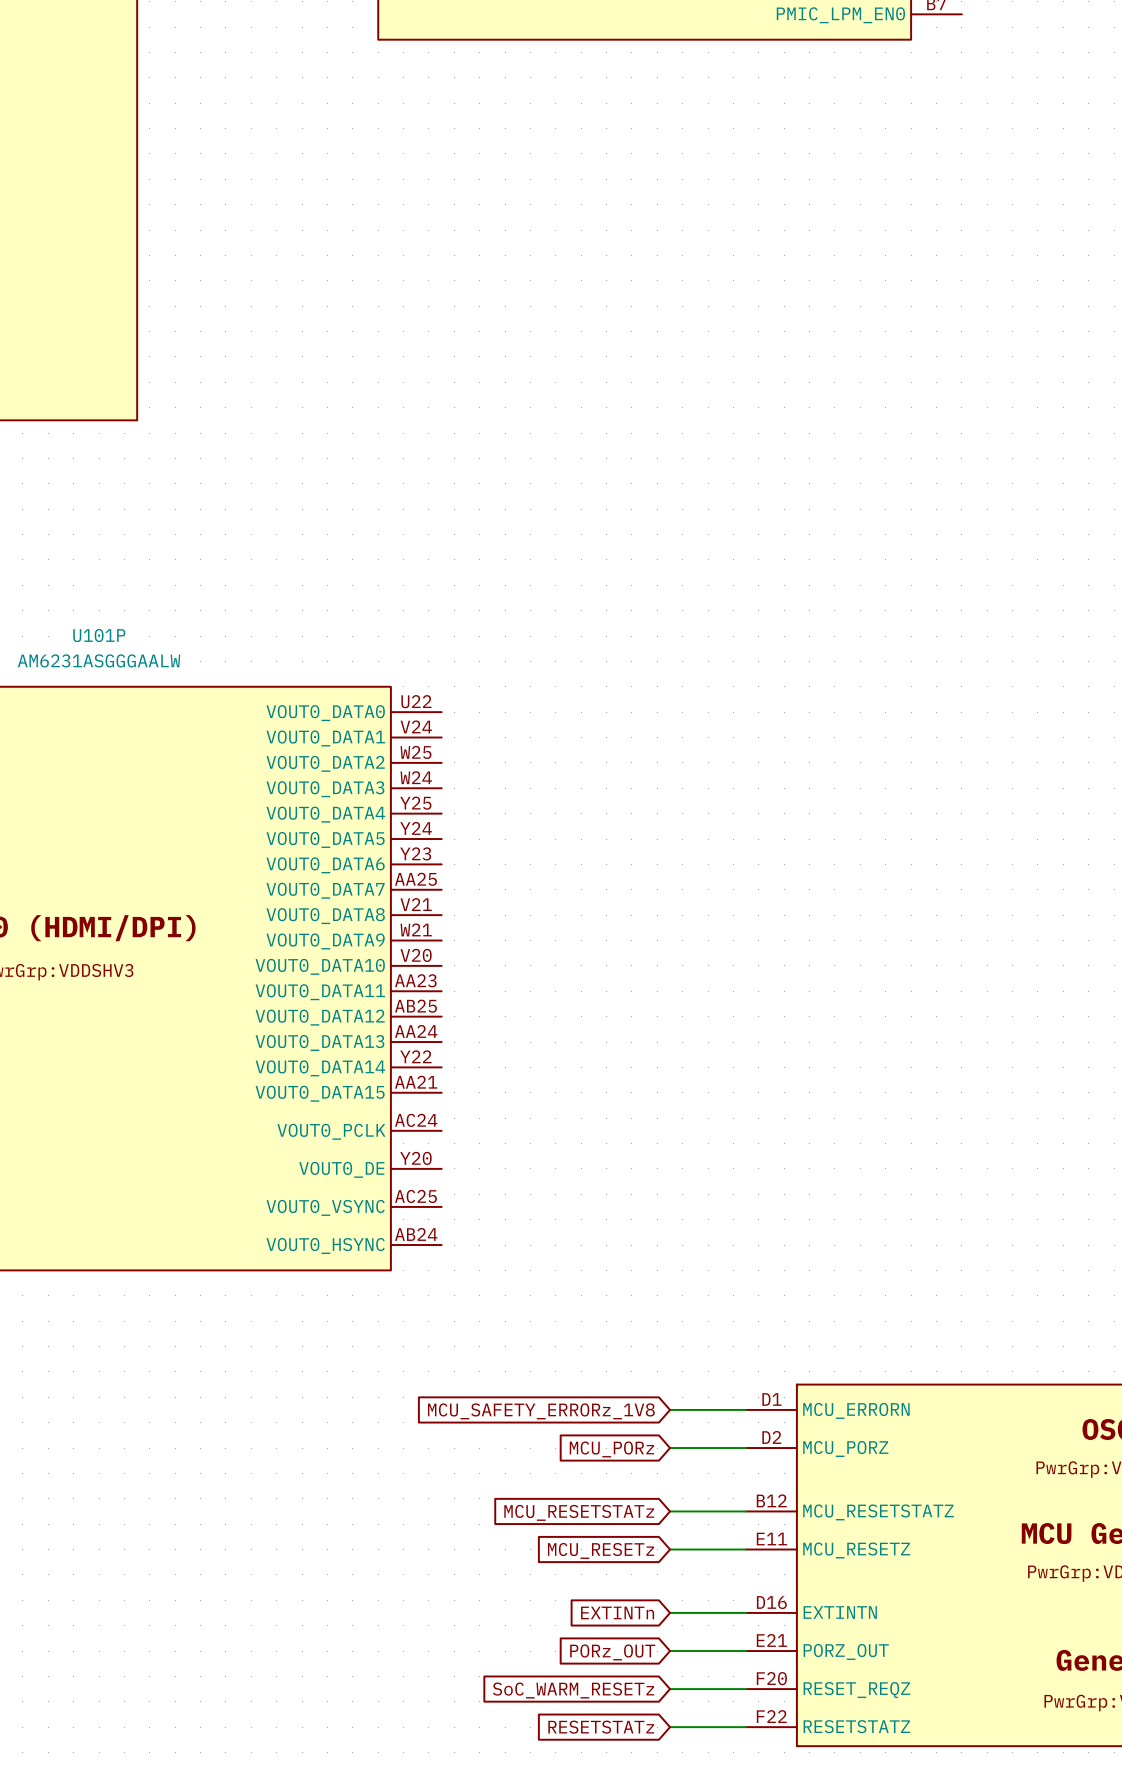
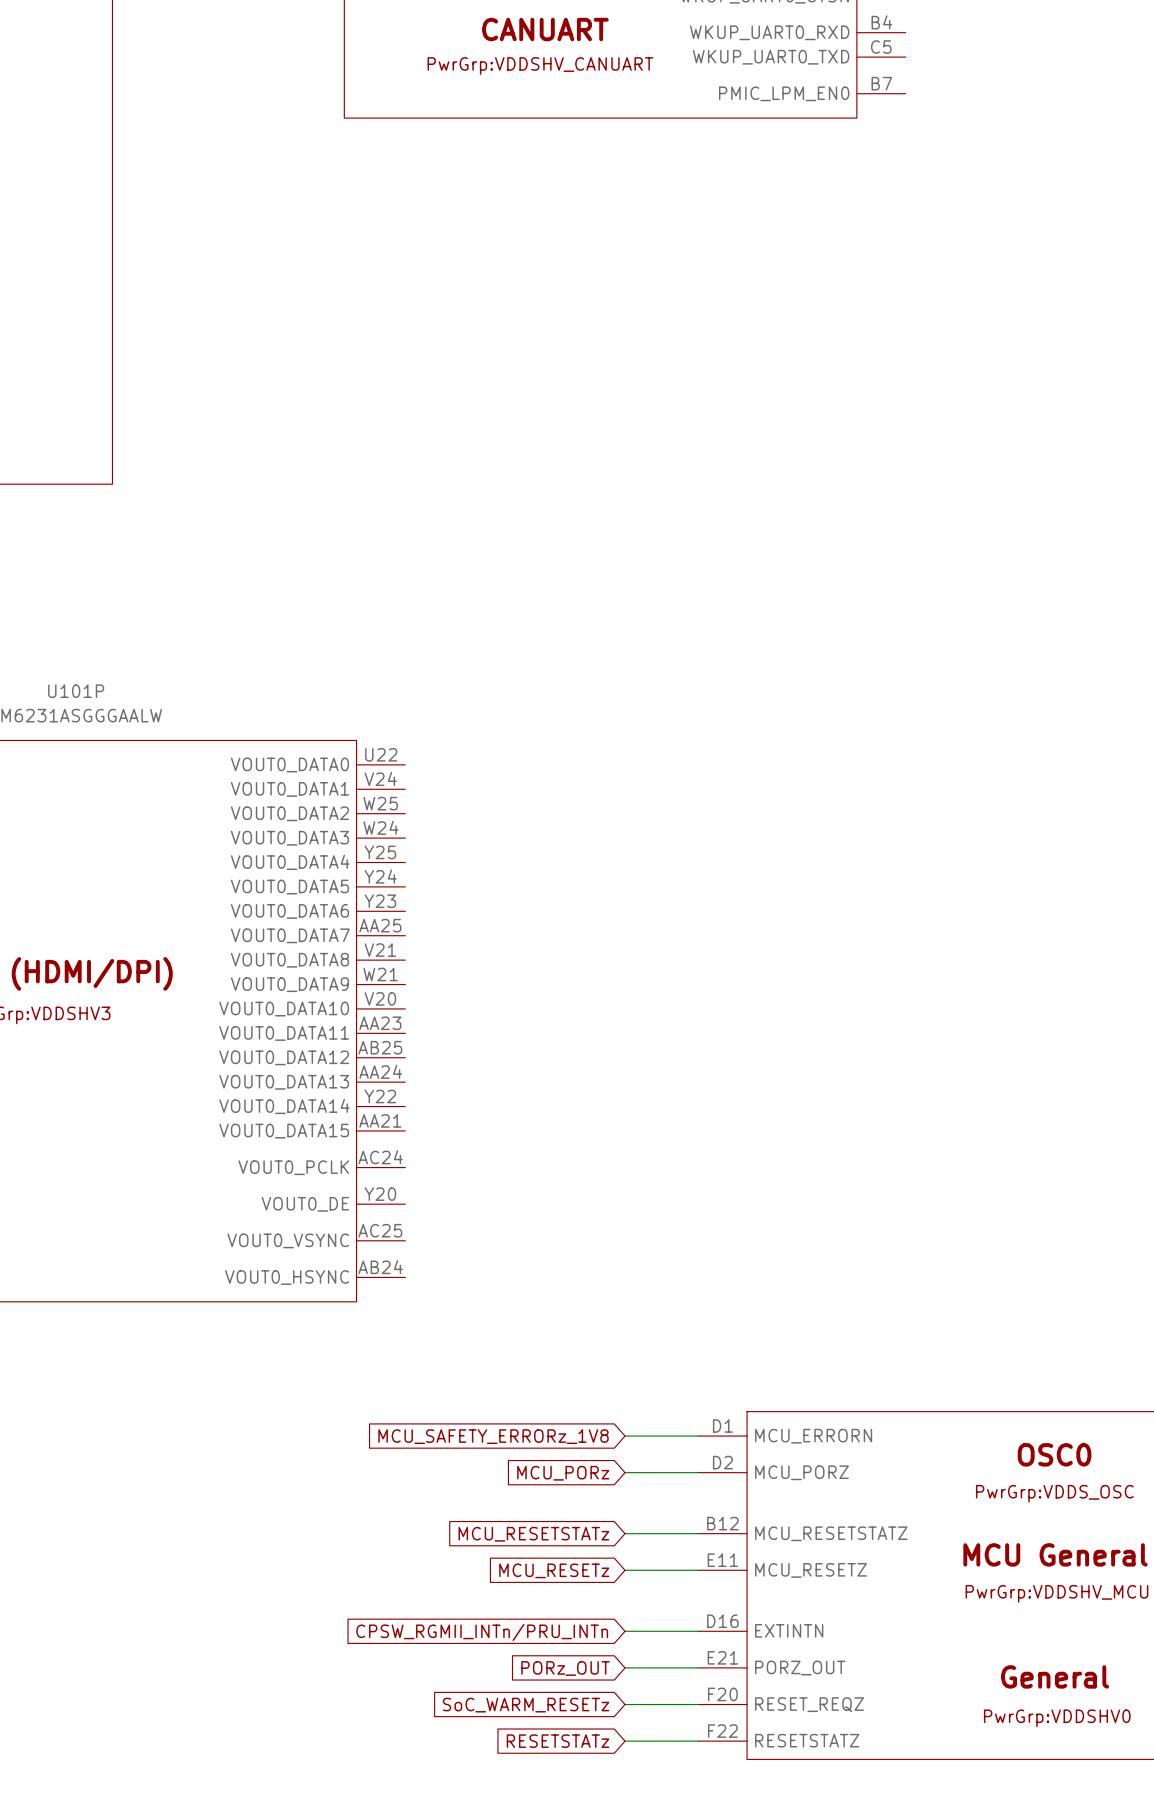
global label: EXTINTn (617, 1612) -> CPSW_RGMII_INTn/PRU_INTn (482, 1632)

